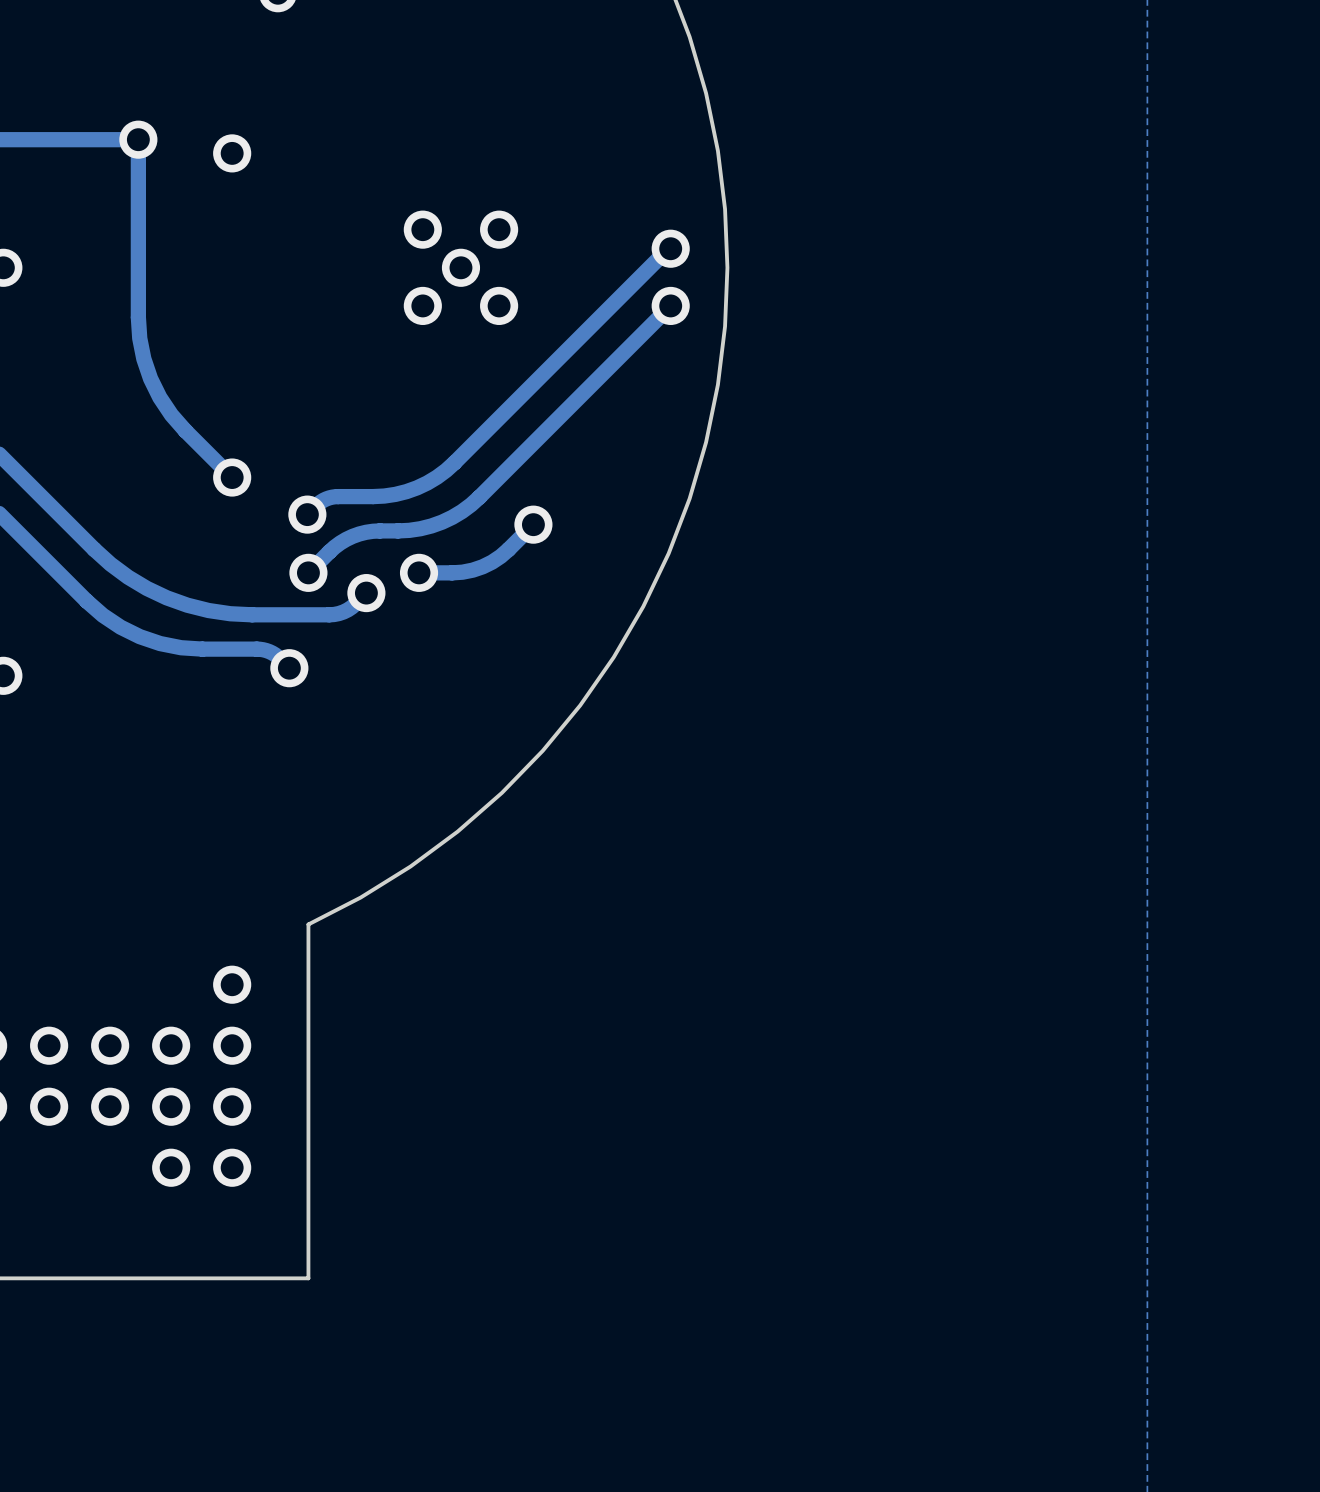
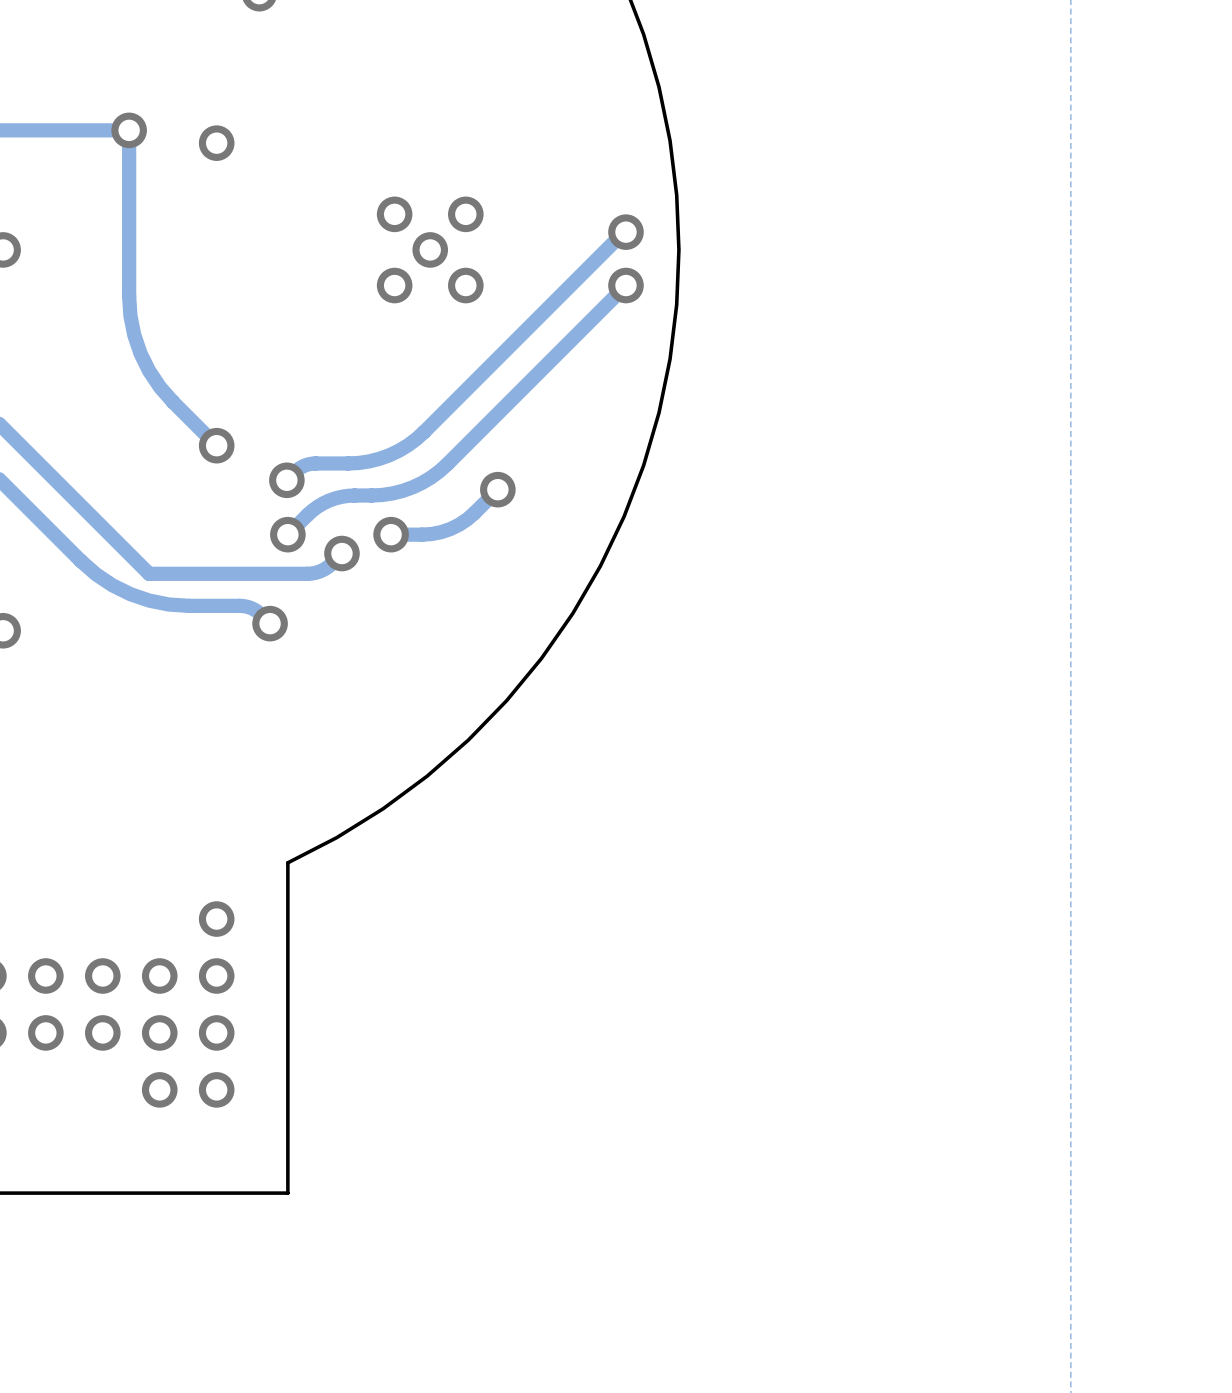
track: (94, 549) (128, 577) (166, 597) (208, 610) (252, 614) -> (88, 512) (149, 573) (235, 573)

